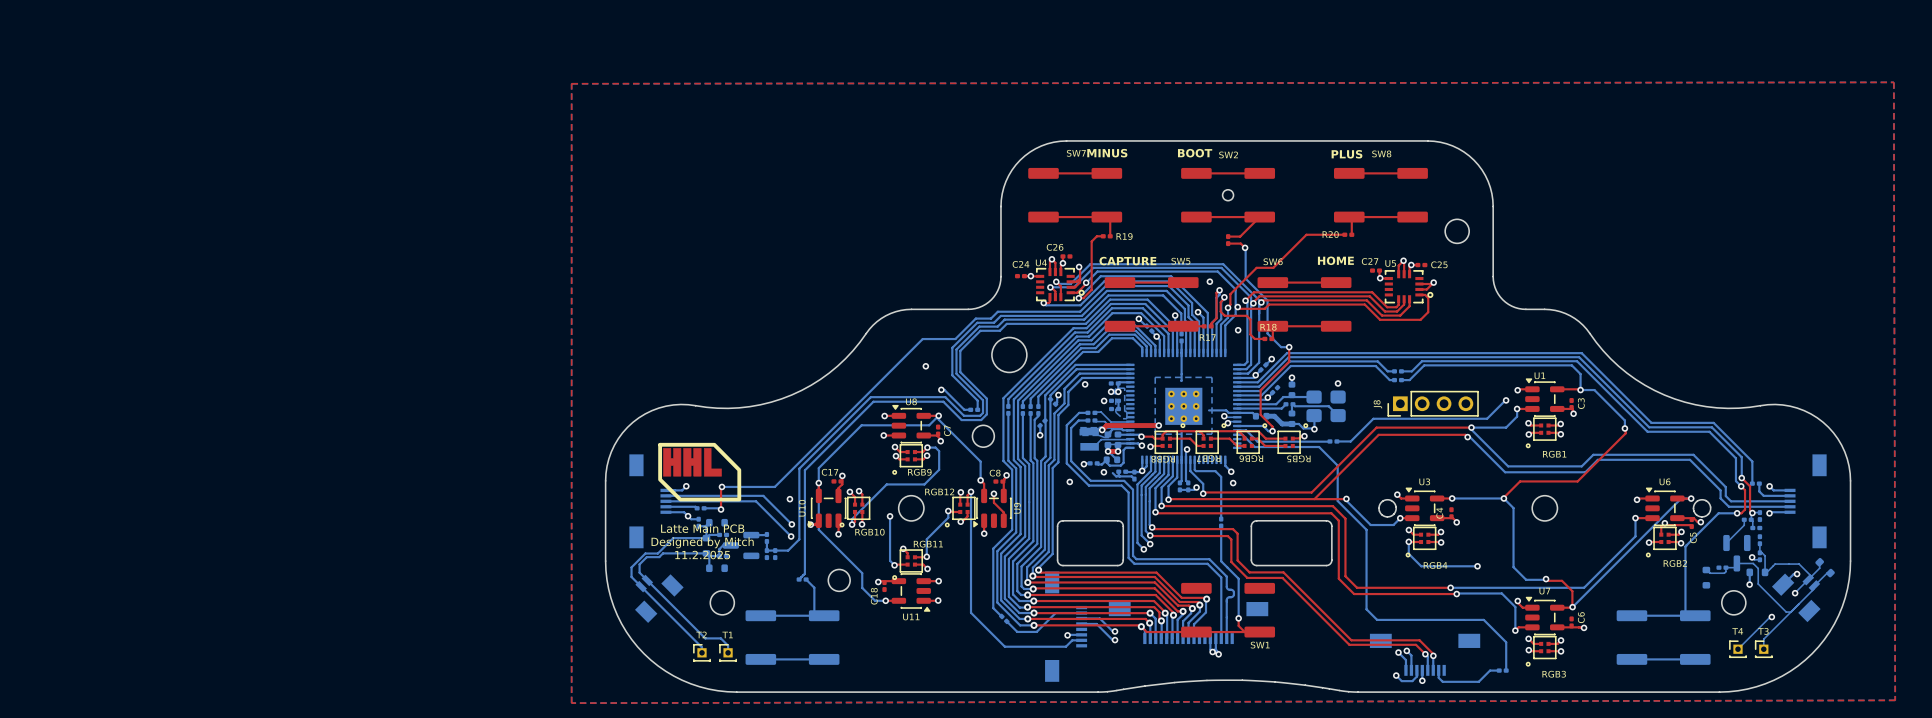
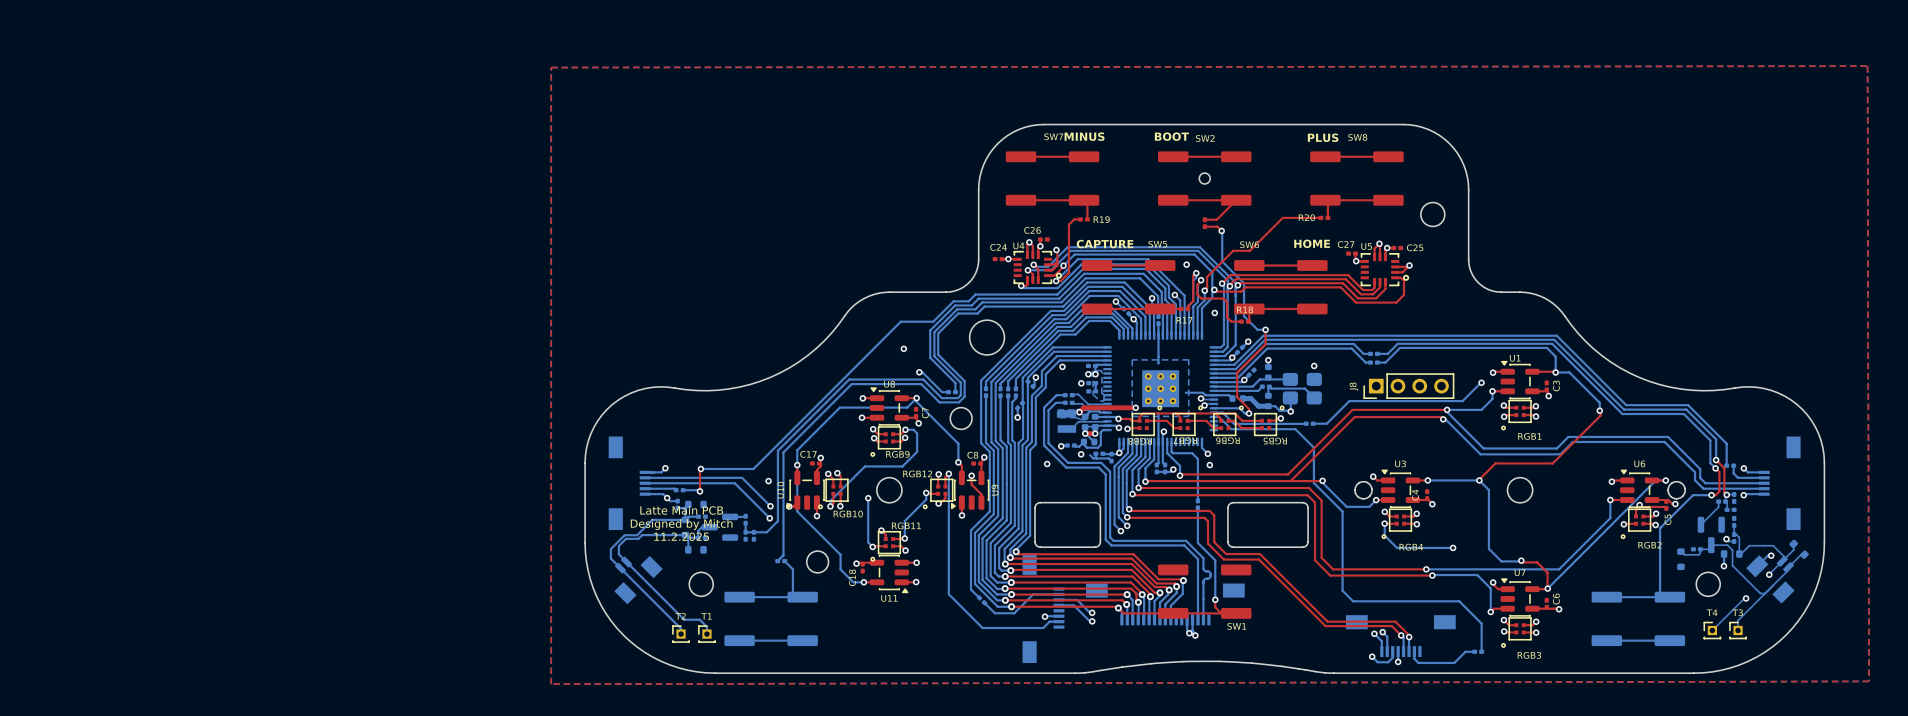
drawing: [658, 442, 742, 502] -> none

